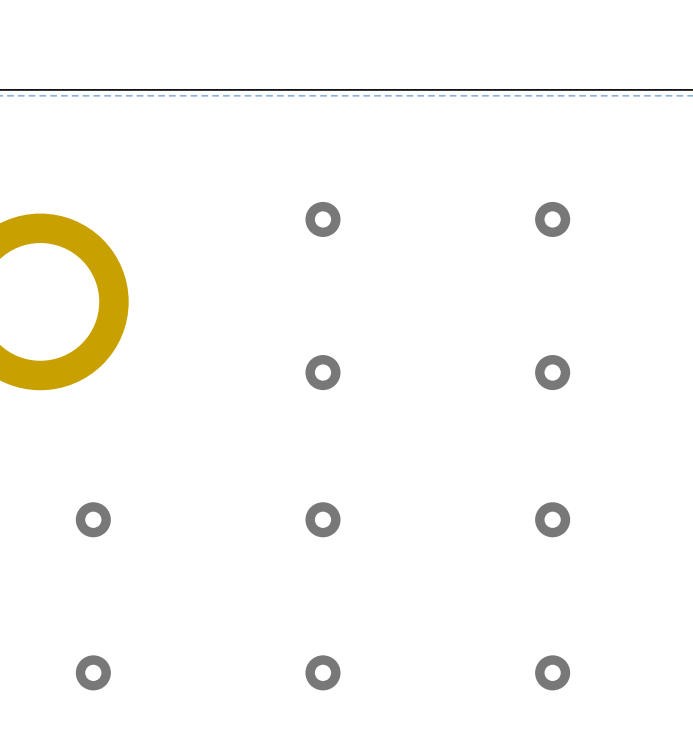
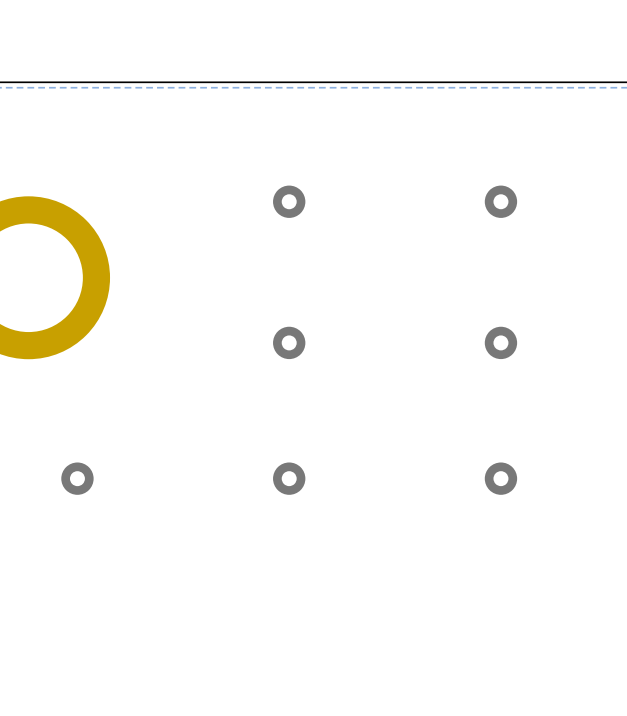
via: (93, 672) -> none
via: (322, 672) -> none
via: (552, 672) -> none

